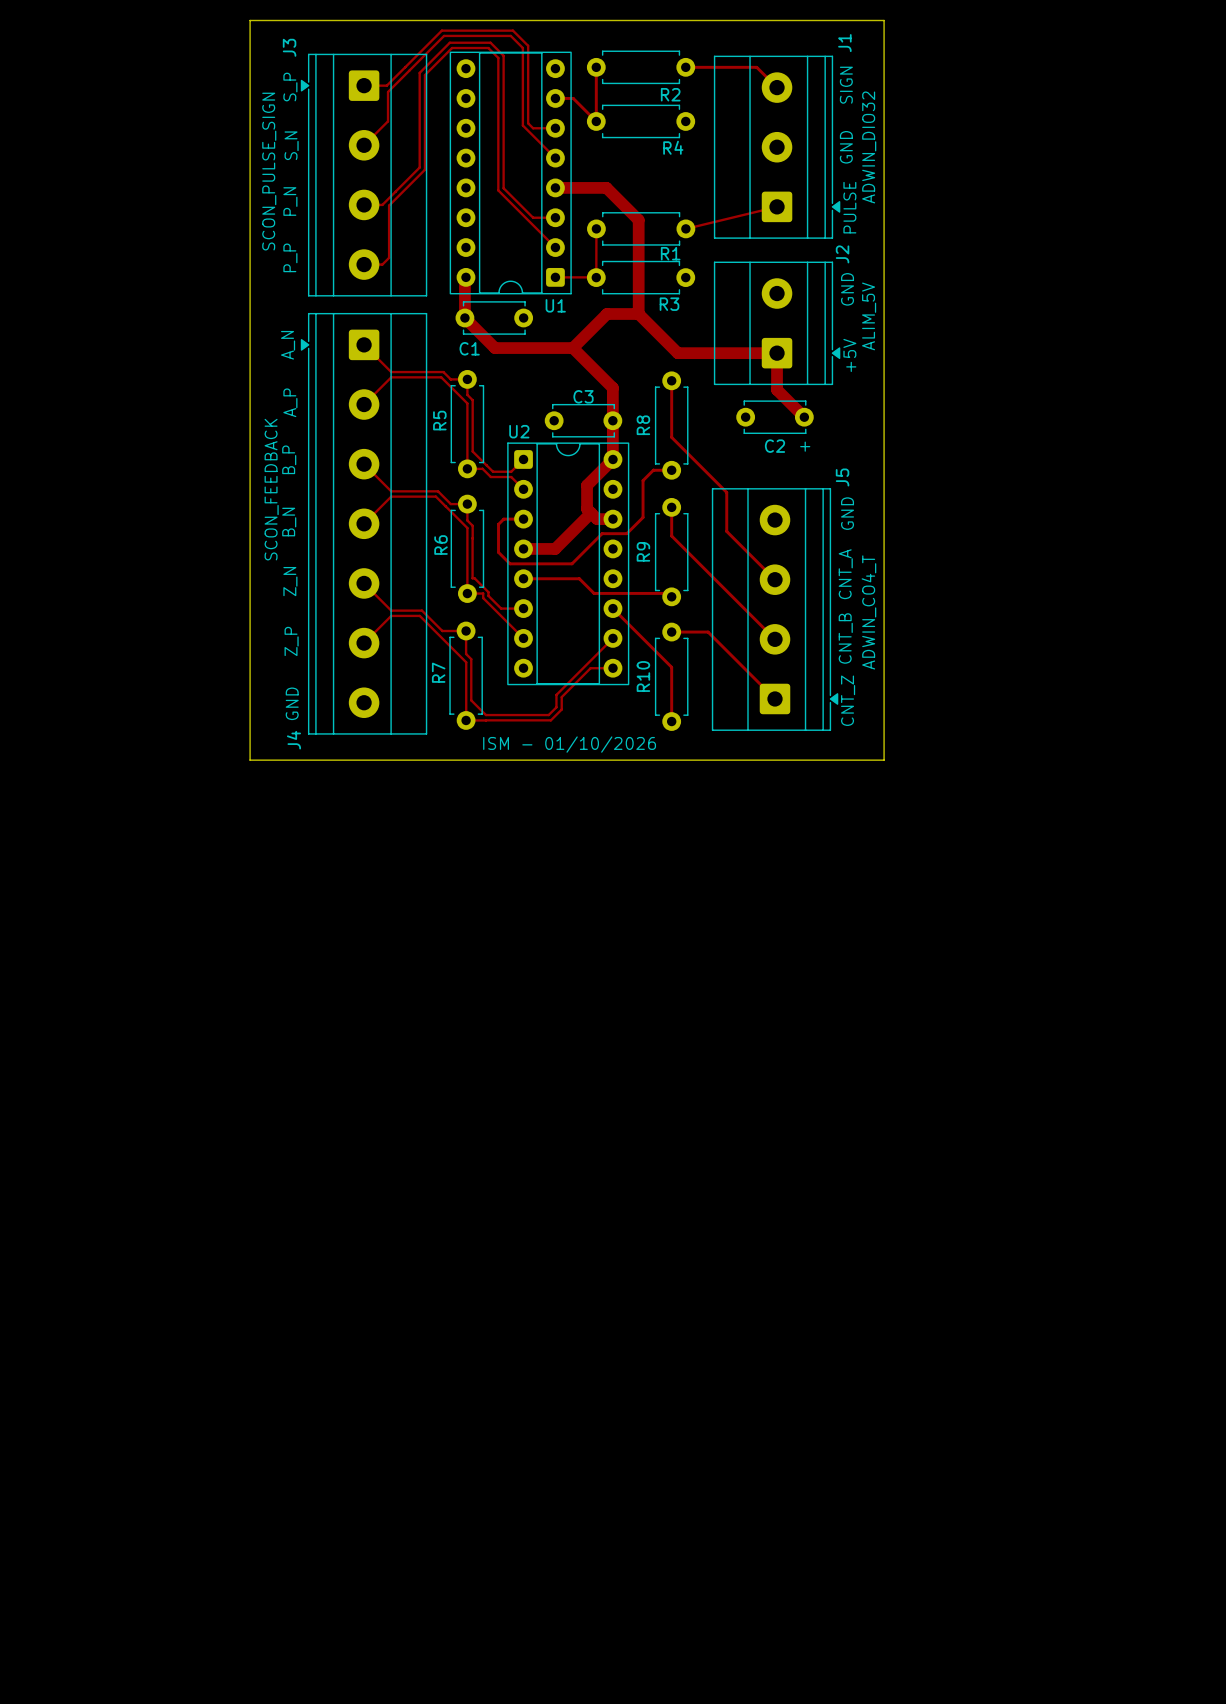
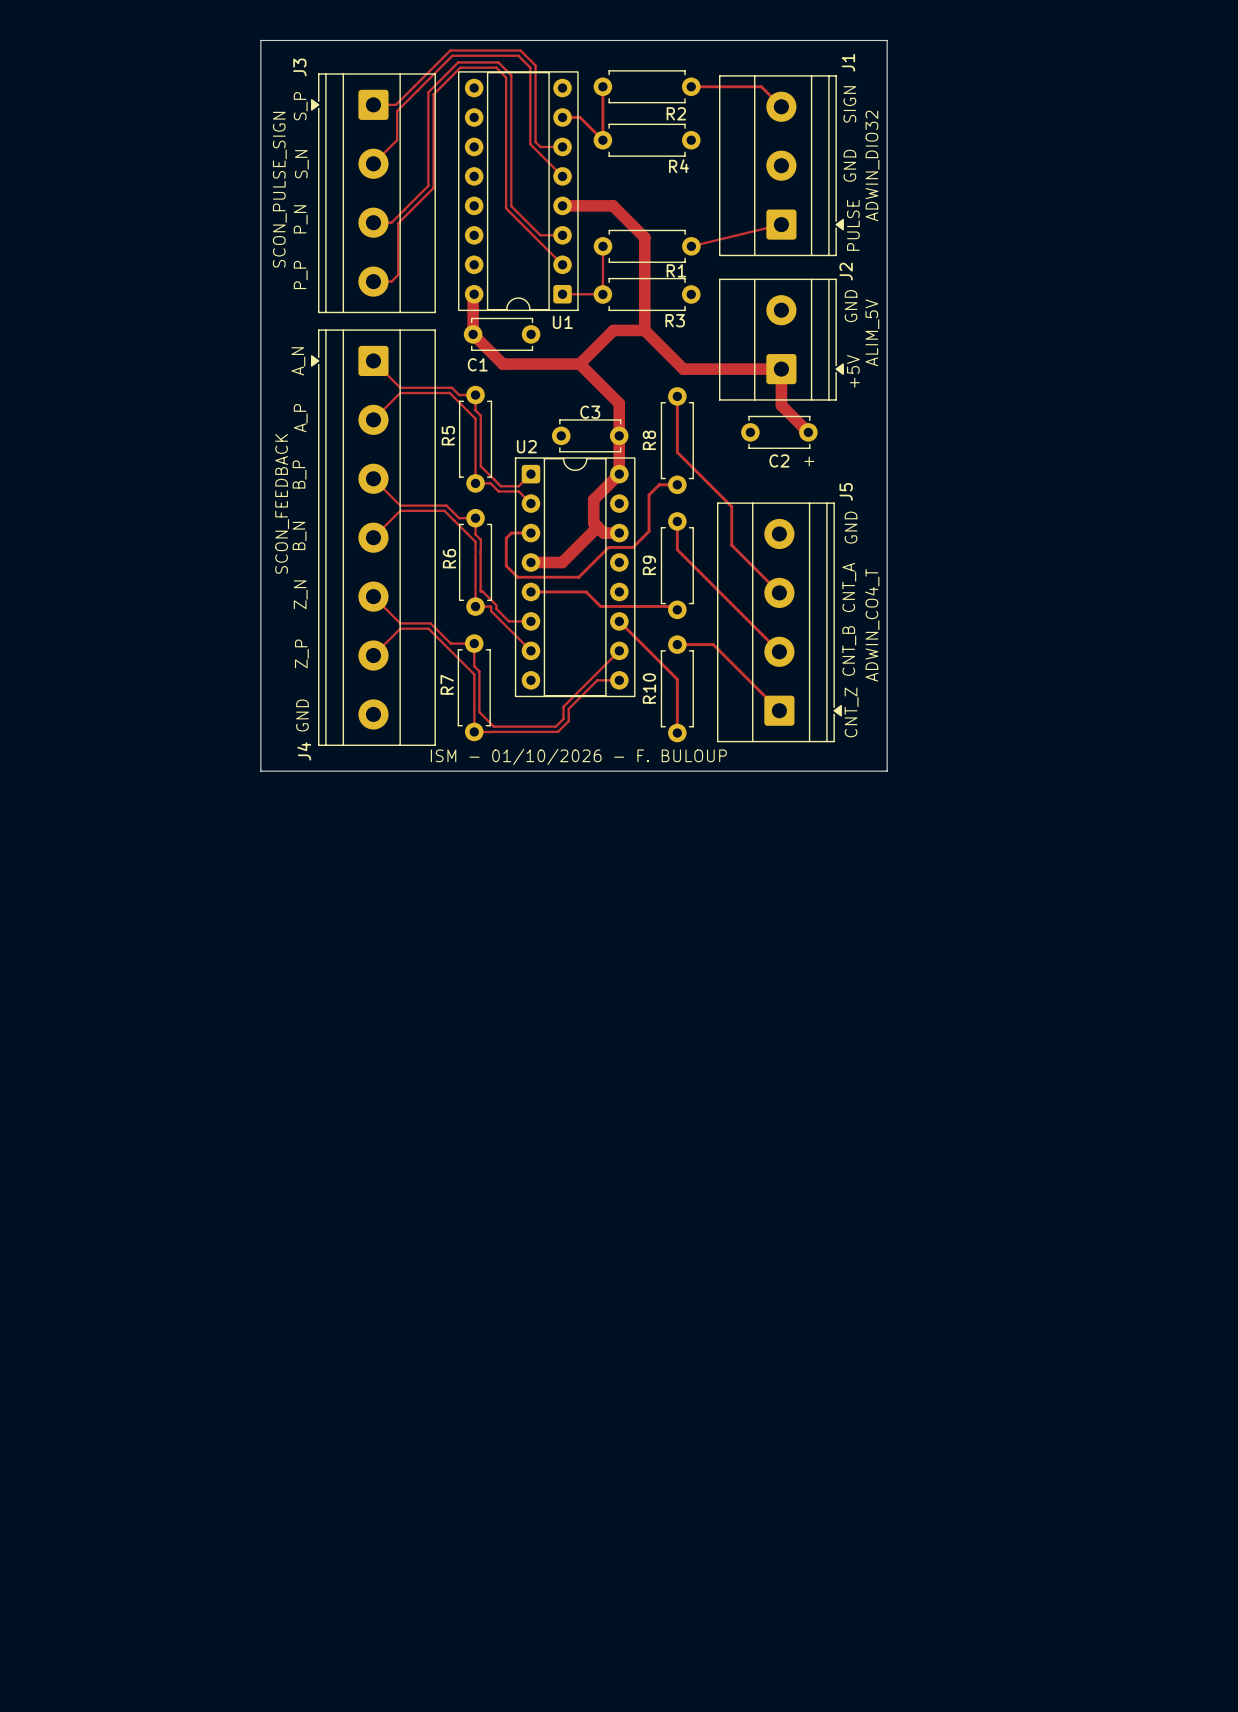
text: ISM - 01/10/2026 (569, 744) -> ISM - 01/10/2026 - F. BULOUP (578, 756)

